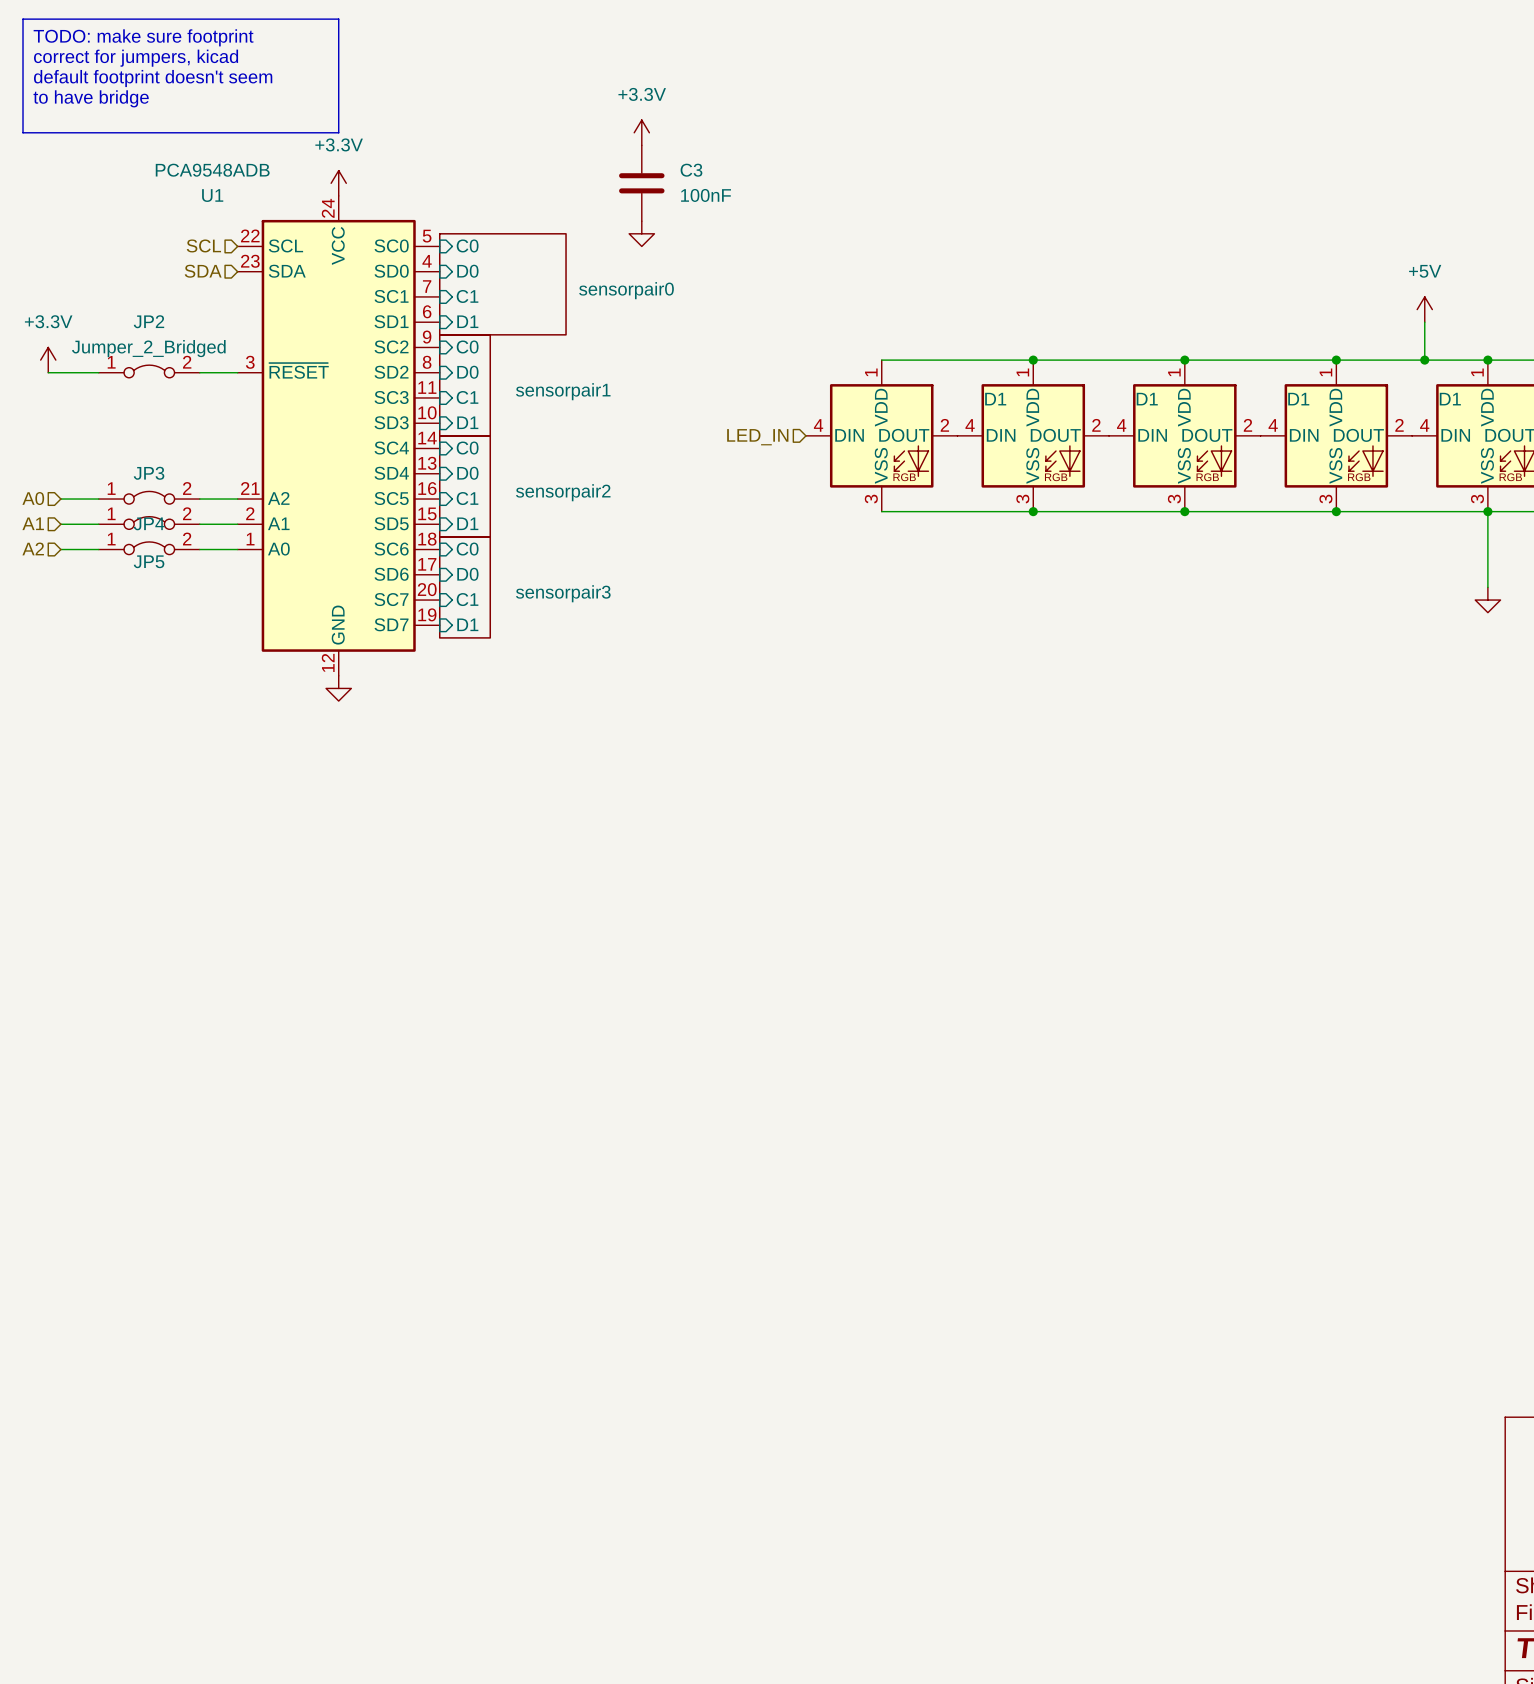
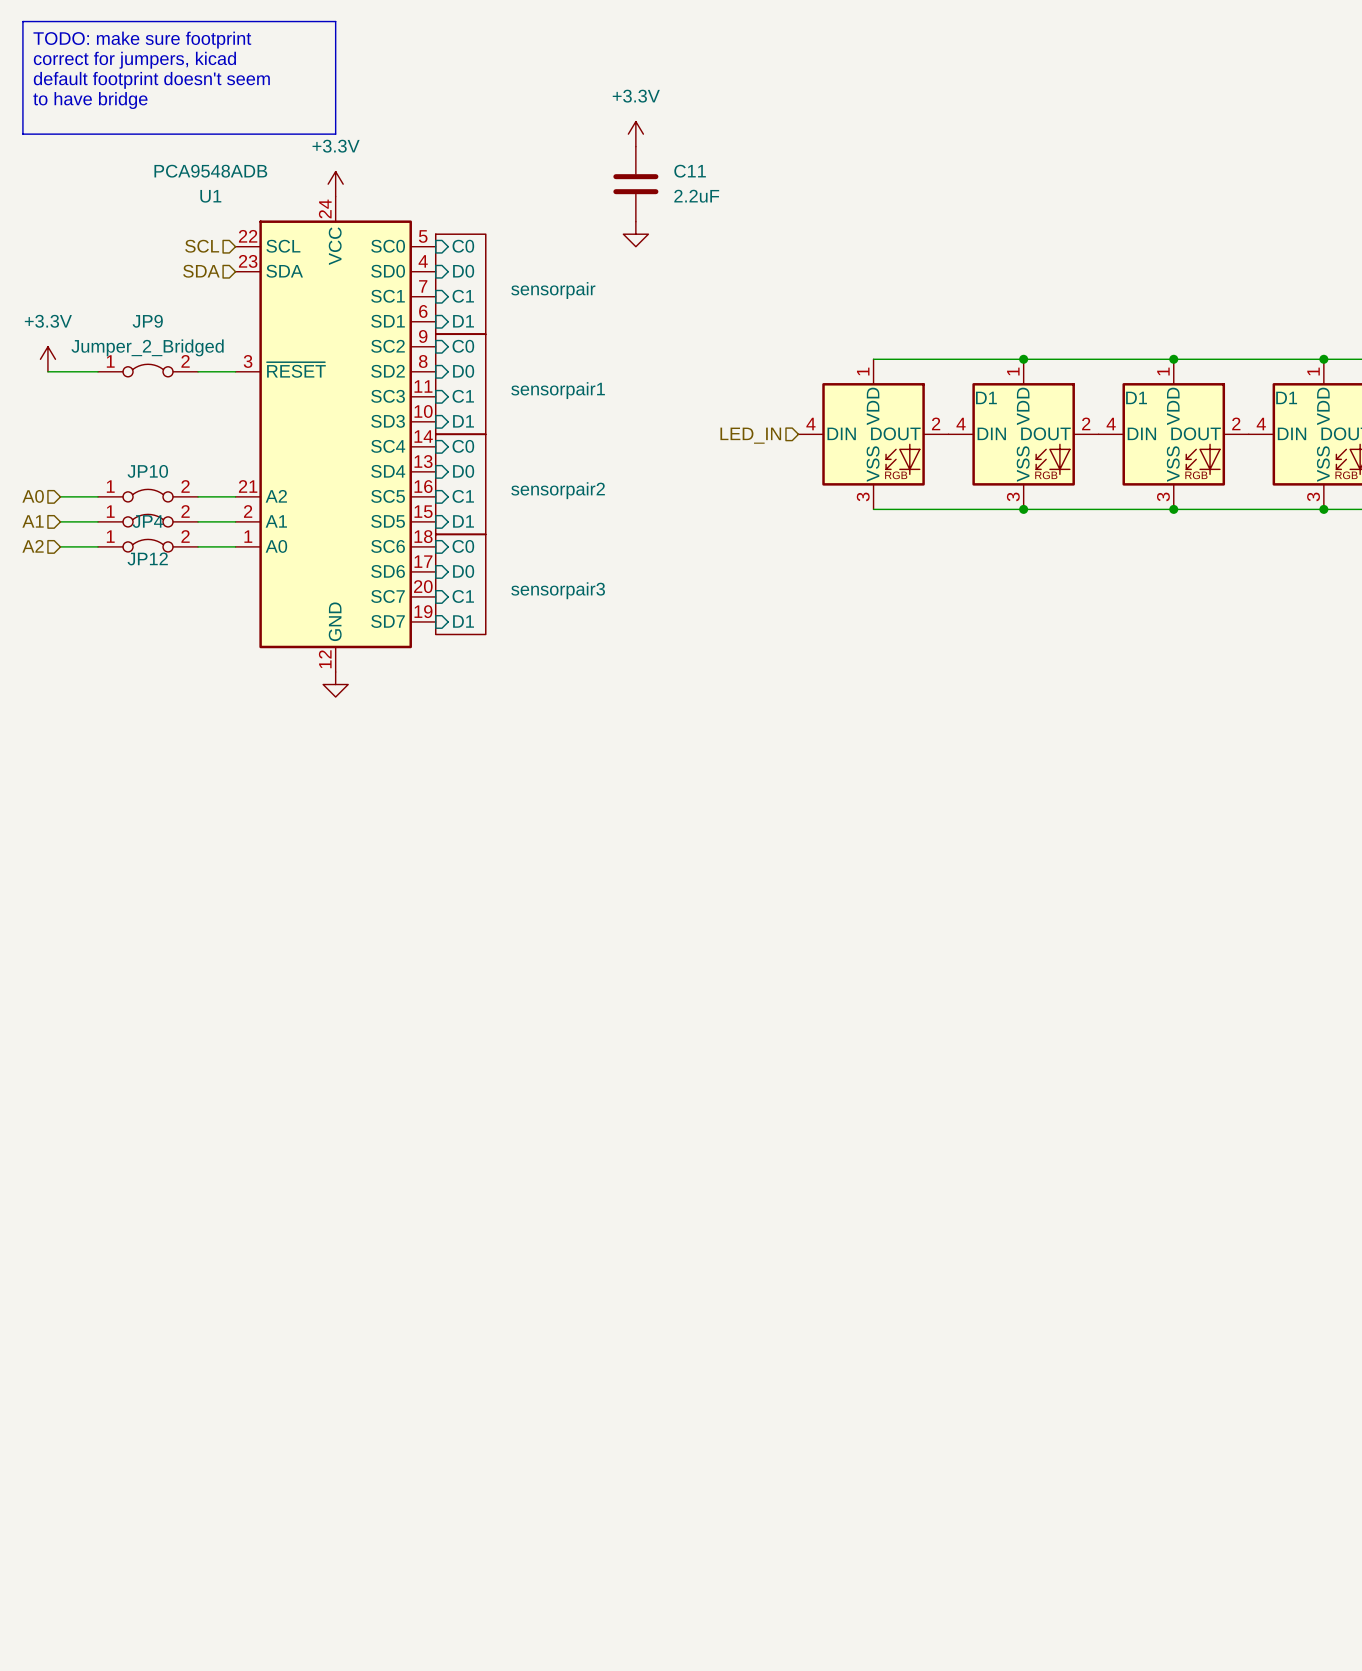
C3 name: C3 (691, 170) -> C11 (690, 171)
C3 value: 100nF (706, 195) -> 2.2uF (696, 196)
sheet sensorpair: none -> (460, 284)
sheet sensorpair0: (502, 284) -> none
JP2 name: JP2 (148, 321) -> JP9 (147, 321)
JP3 name: JP3 (149, 473) -> JP10 (147, 471)
JP5 name: JP5 (149, 561) -> JP12 (147, 558)

